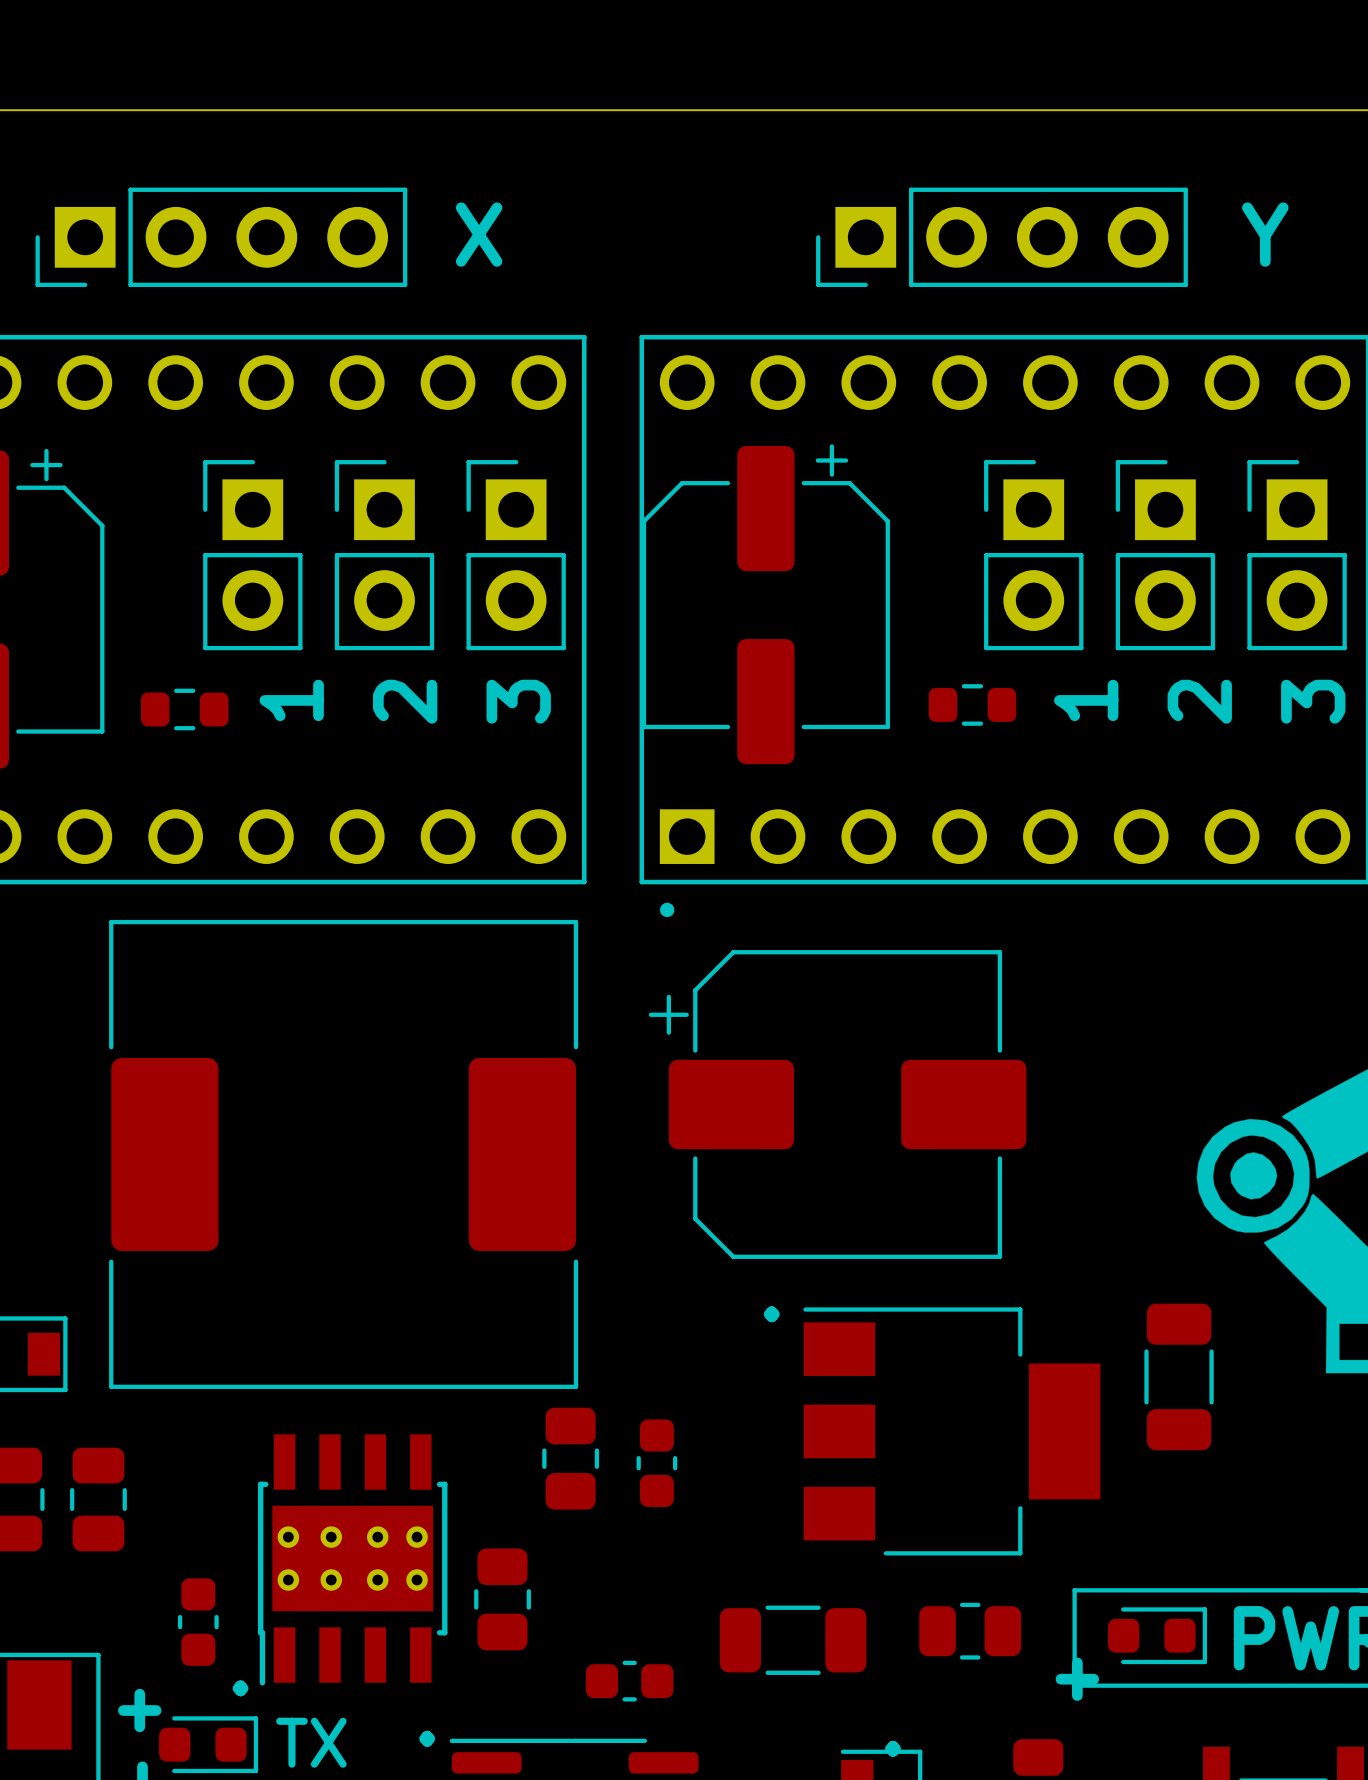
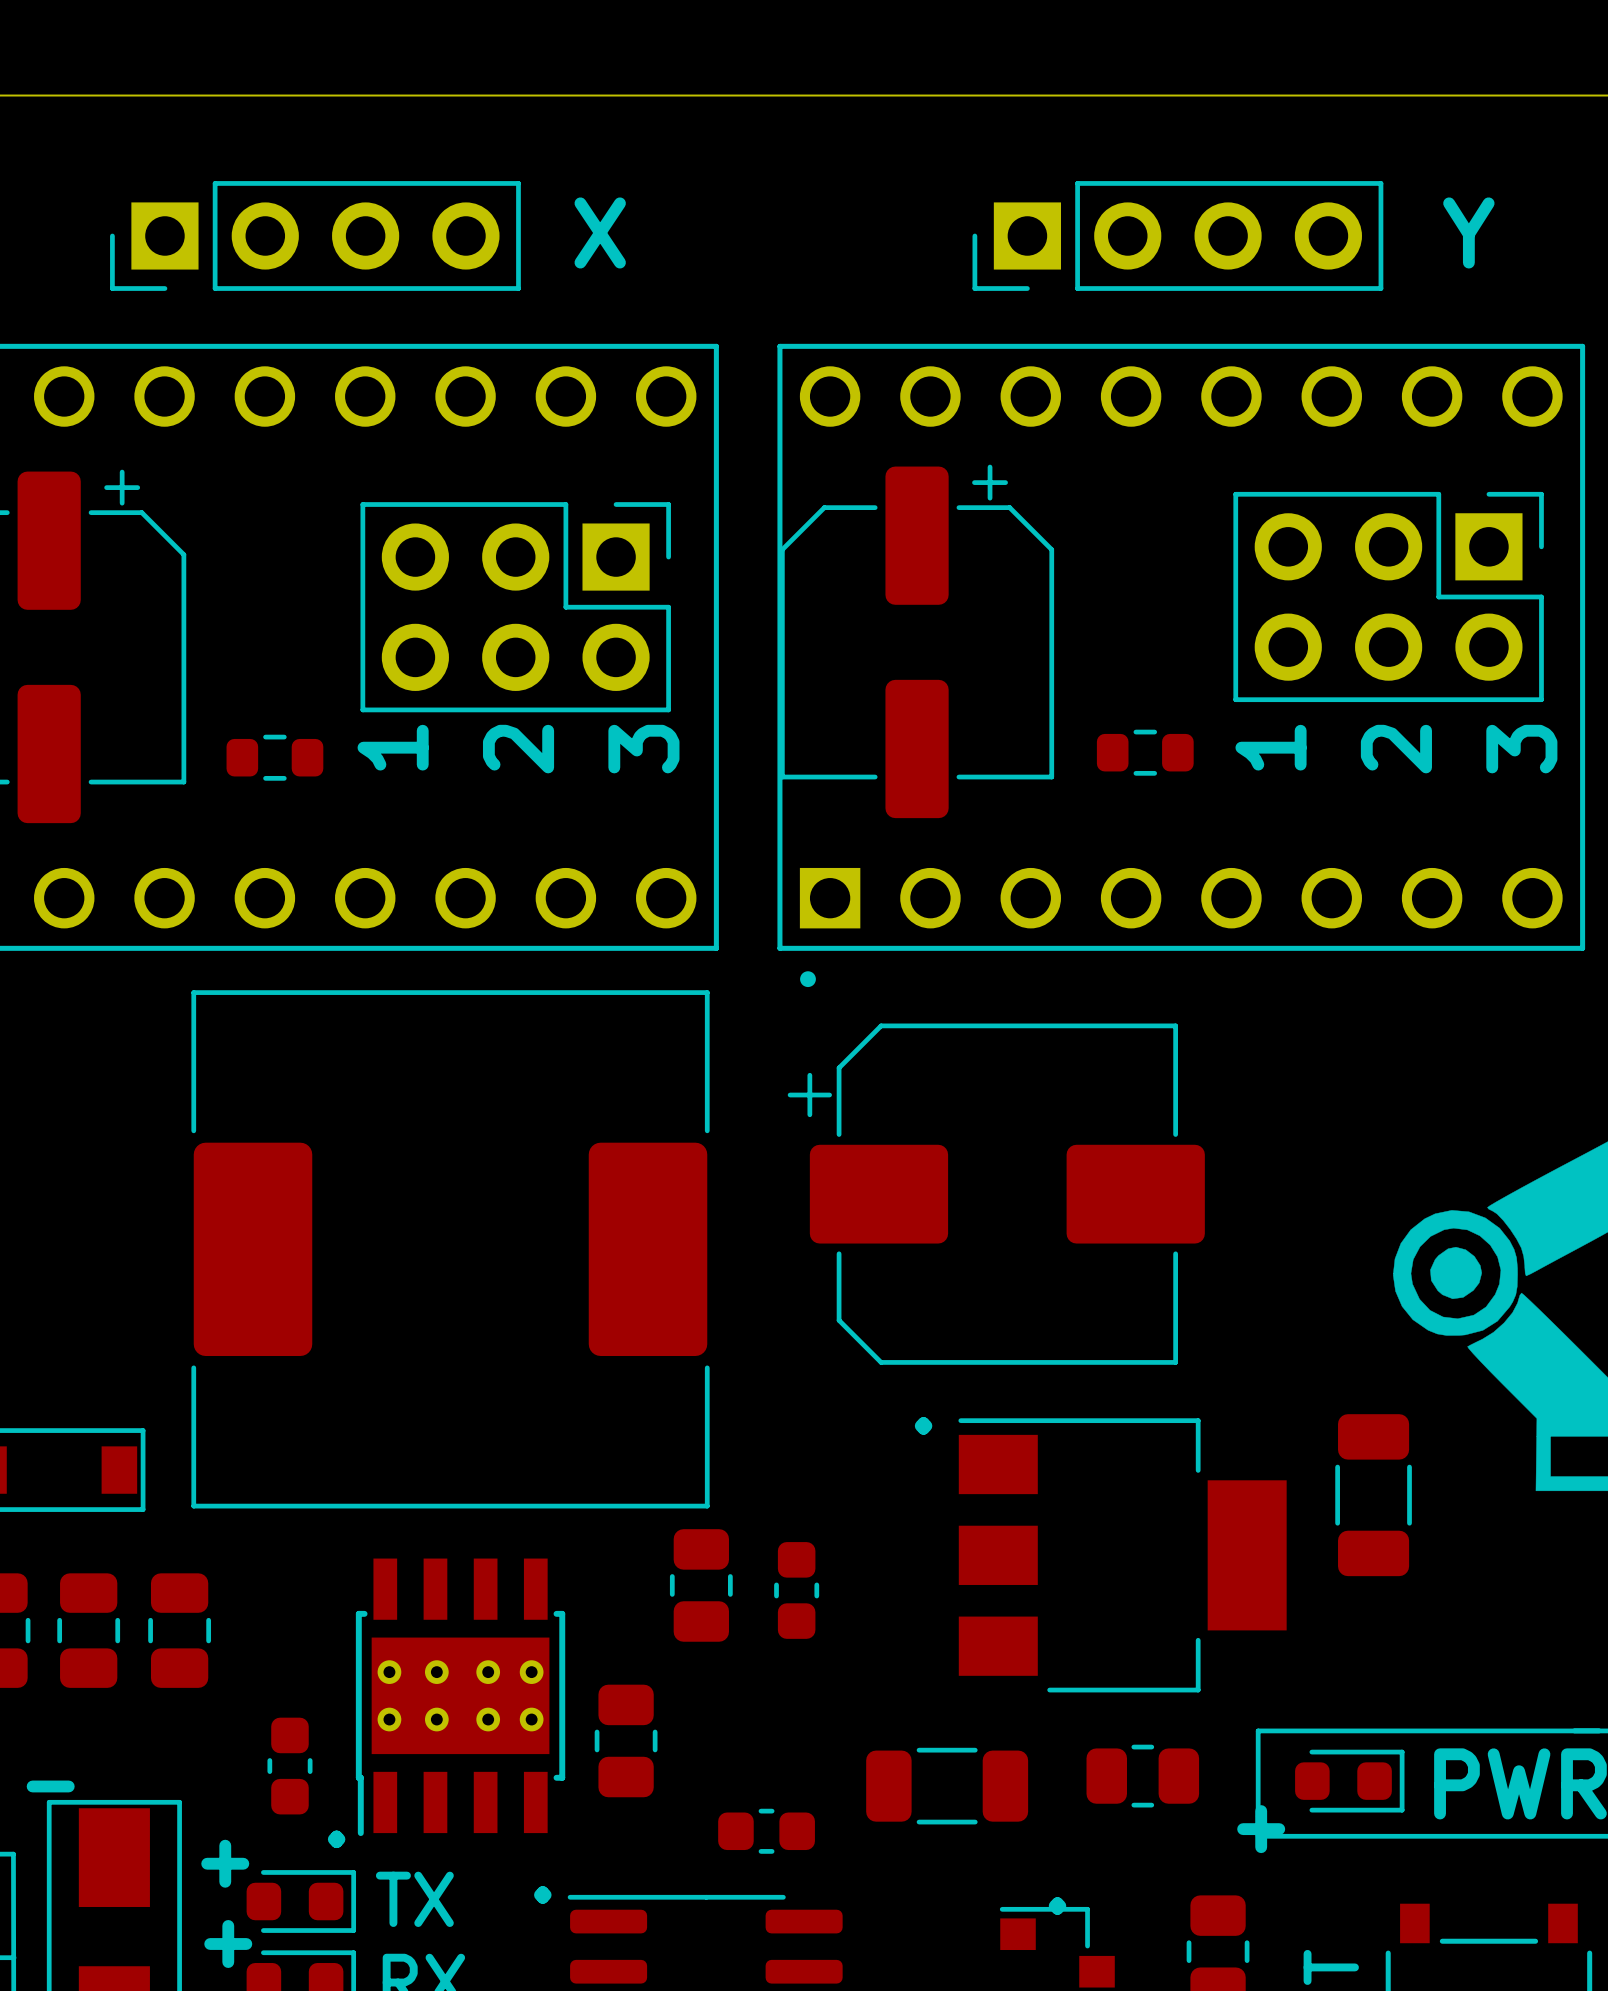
part footprint: [334, 460, 435, 651] -> [360, 502, 671, 713]
part footprint: [1115, 460, 1216, 651] -> [1233, 491, 1544, 703]
part: (252, 555) -> none
part: (516, 555) -> none
part: (1033, 555) -> none
part: (1297, 555) -> none

